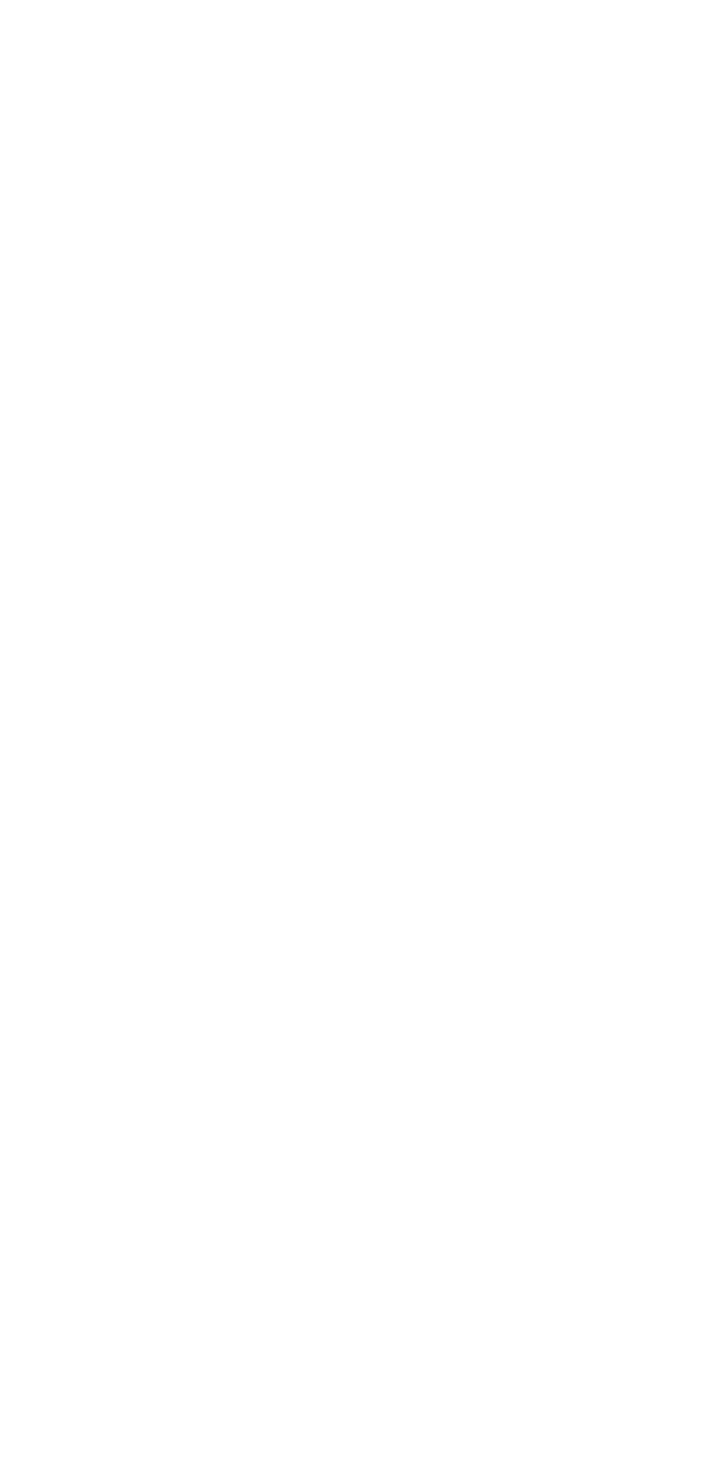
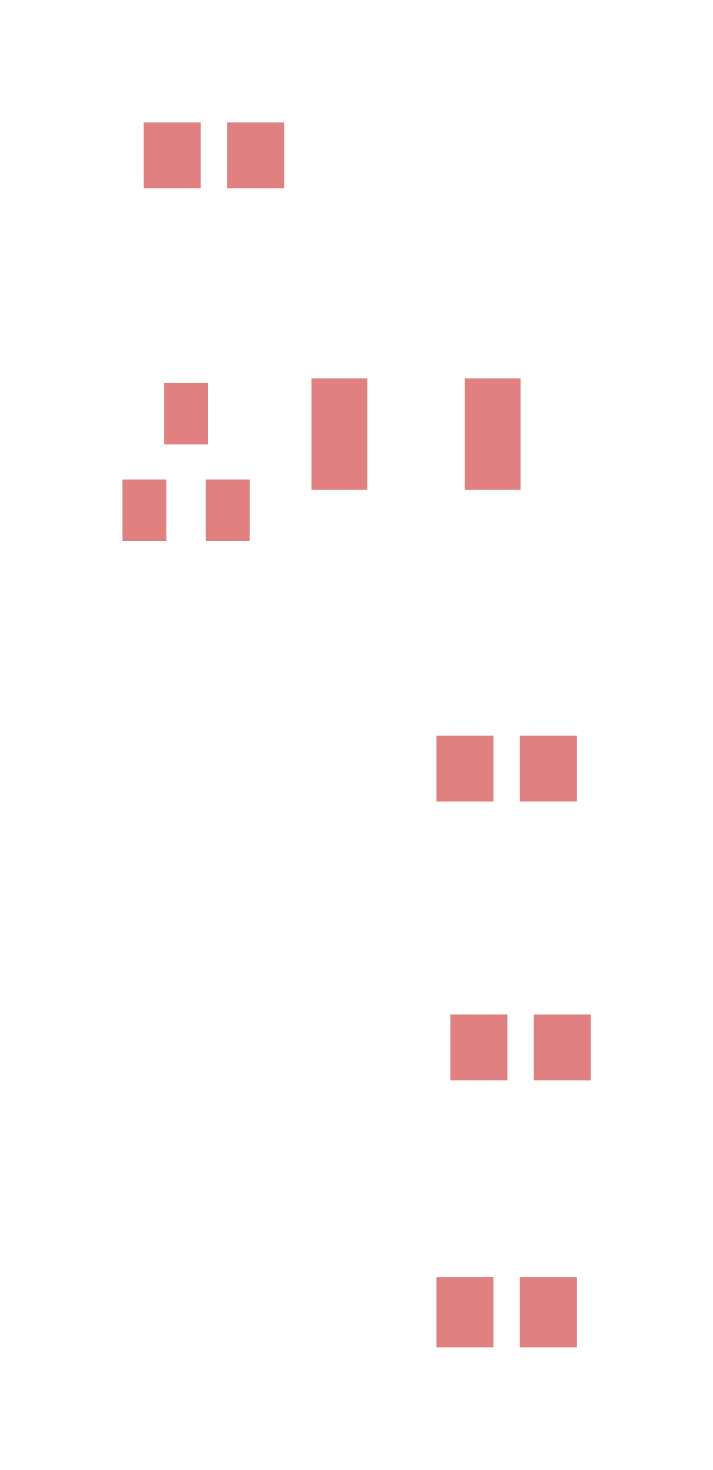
part: none -> (213, 155)
part: none -> (339, 434)
part: none -> (492, 434)
part: none -> (186, 461)
part: none -> (506, 768)
part: none -> (520, 1047)
part: none -> (506, 1312)

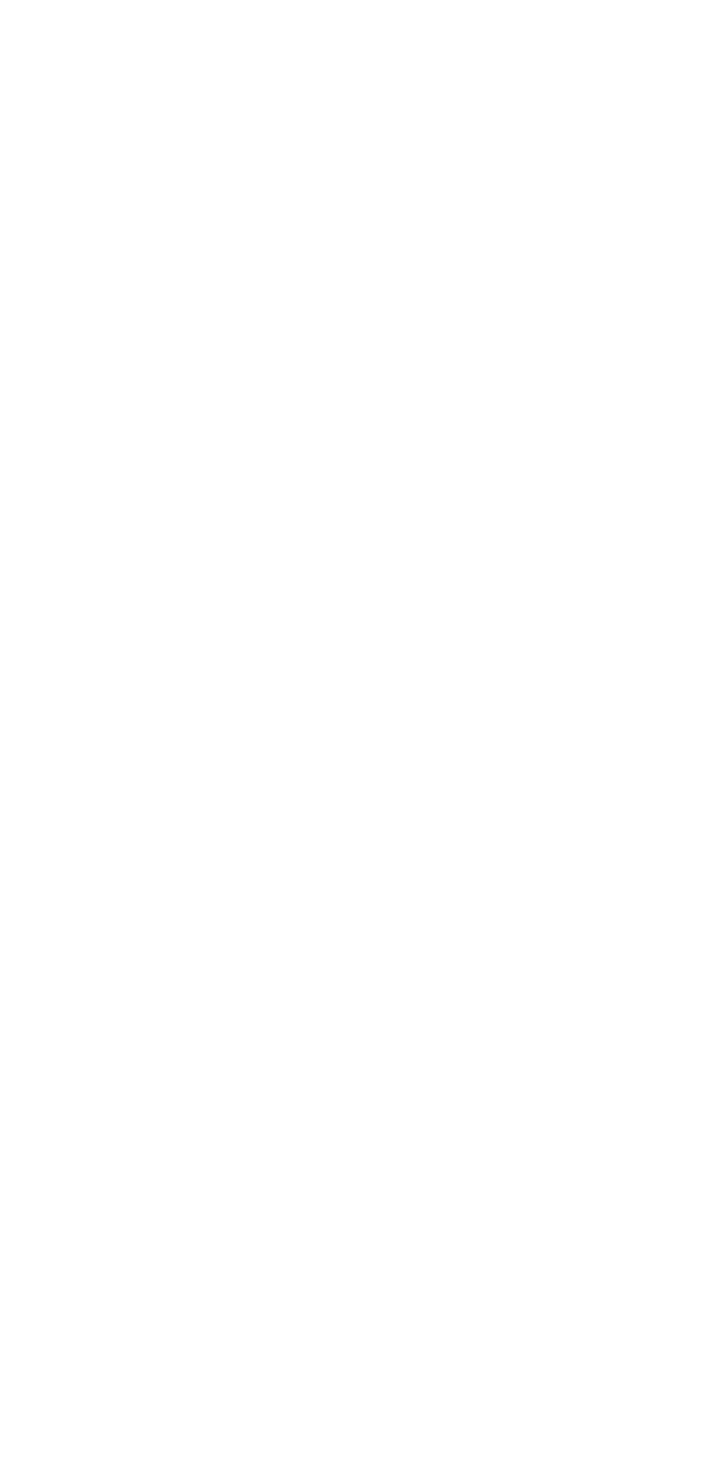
part: (213, 155) -> none
part: (339, 434) -> none
part: (492, 434) -> none
part: (186, 461) -> none
part: (506, 768) -> none
part: (520, 1047) -> none
part: (506, 1312) -> none

